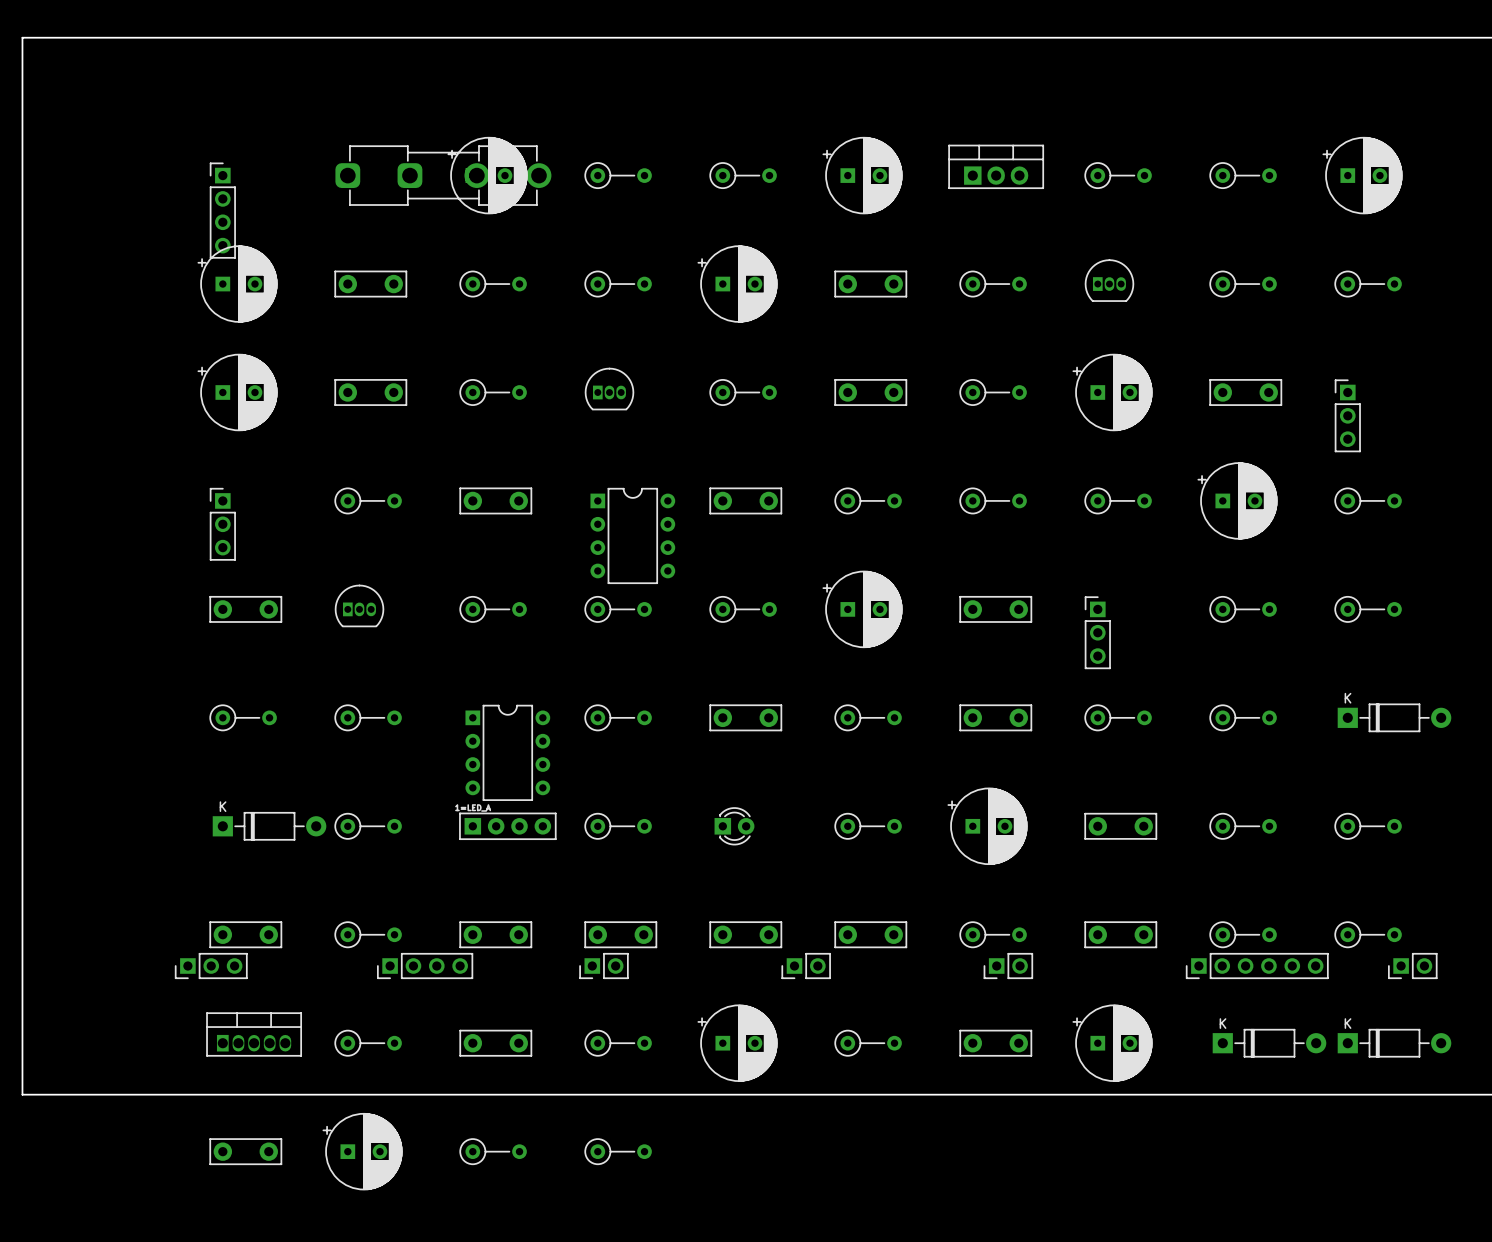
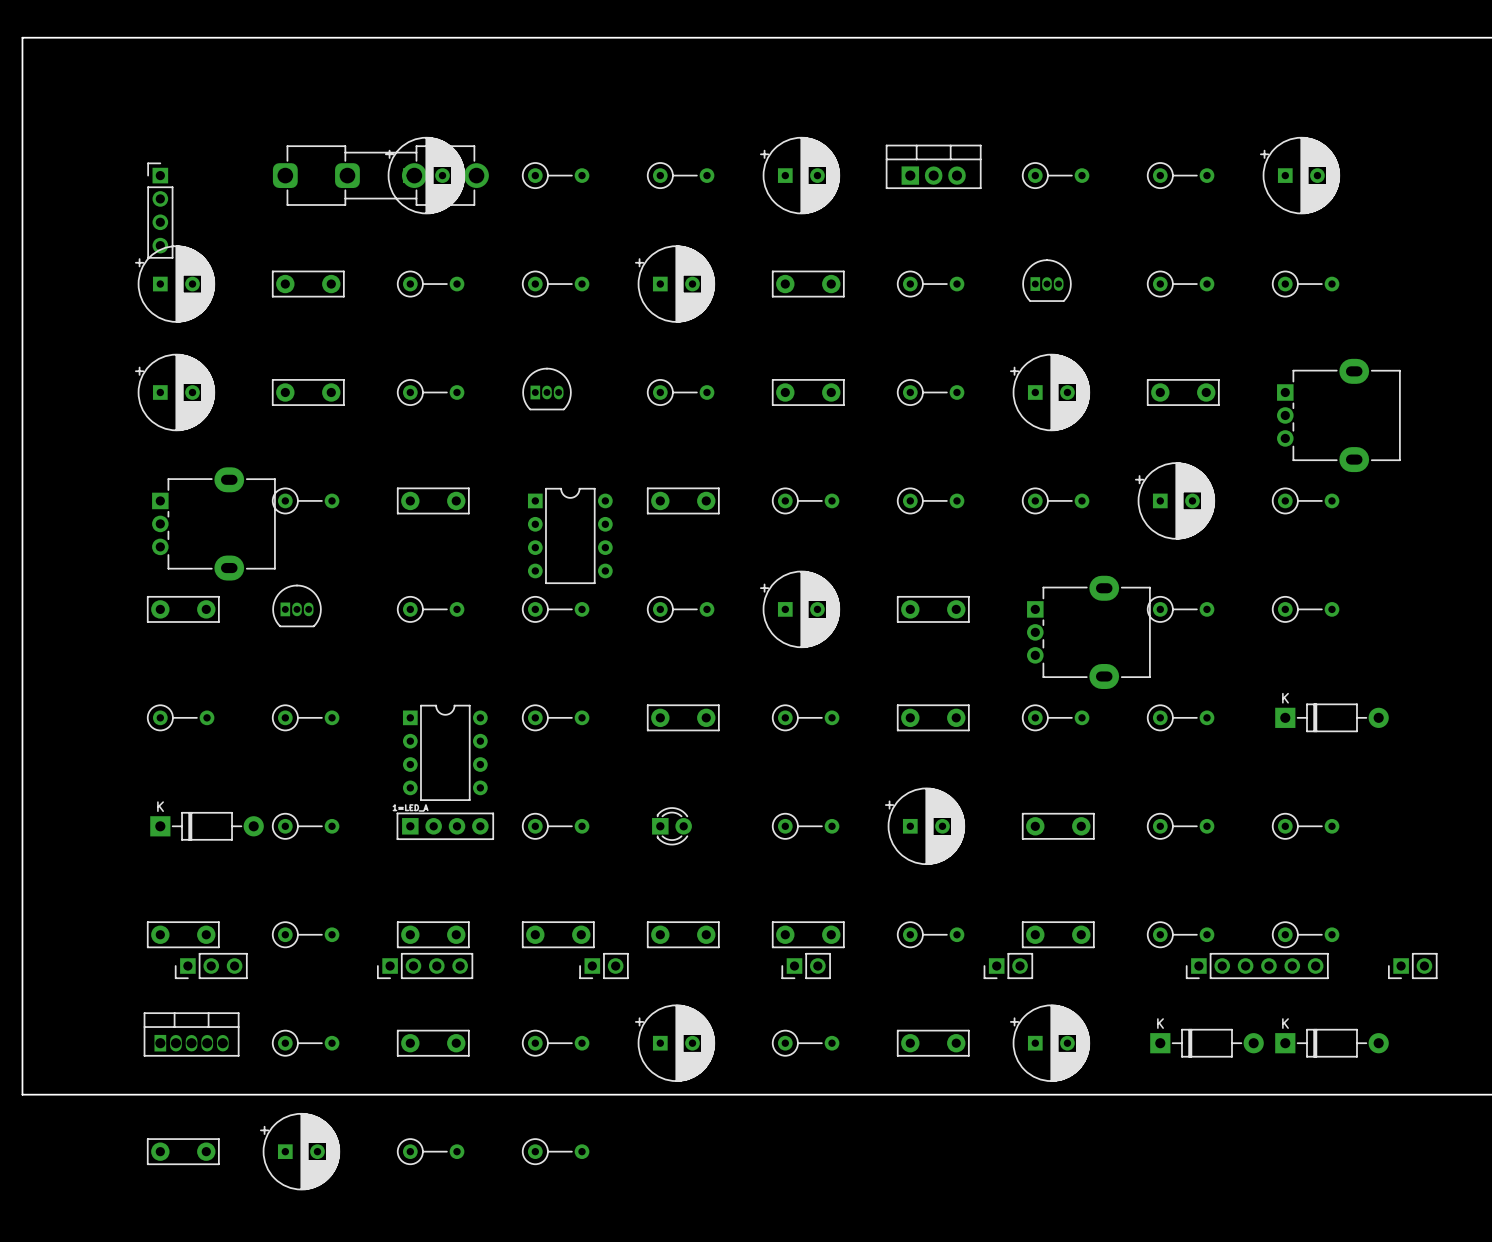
part position: (996, 166) -> (933, 166)
part position: (443, 175) -> (380, 175)
part position: (487, 175) -> (425, 175)
part: none -> (555, 175)
part: (618, 175) -> none
part: none -> (680, 175)
part: (743, 175) -> none
part: none -> (800, 175)
part: (862, 175) -> none
part: none -> (1055, 175)
part: (1118, 175) -> none
part: none -> (1180, 175)
part: (1243, 175) -> none
part position: (1362, 175) -> (1300, 175)
part position: (222, 210) -> (160, 210)
part position: (1109, 280) -> (1046, 280)
part: none -> (175, 284)
part: (237, 284) -> none
part: none -> (308, 284)
part: (370, 284) -> none
part: none -> (430, 284)
part: (493, 284) -> none
part: none -> (555, 284)
part: (618, 284) -> none
part: none -> (675, 284)
part: (737, 284) -> none
part: none -> (808, 284)
part: (870, 284) -> none
part: none -> (930, 284)
part: (993, 284) -> none
part: none -> (1180, 284)
part: (1243, 284) -> none
part: none -> (1305, 284)
part: (1368, 284) -> none
part footprint: [1335, 379, 1361, 452] -> [1277, 358, 1401, 473]
part position: (609, 389) -> (546, 389)
part: none -> (175, 392)
part: (237, 392) -> none
part: none -> (308, 392)
part: (370, 392) -> none
part: none -> (430, 392)
part: (493, 392) -> none
part: none -> (680, 392)
part: (743, 392) -> none
part: none -> (808, 392)
part: (870, 392) -> none
part: none -> (930, 392)
part: (993, 392) -> none
part: none -> (1050, 392)
part: (1112, 392) -> none
part position: (1245, 392) -> (1183, 392)
part footprint: [210, 488, 236, 561] -> [152, 467, 276, 581]
part: none -> (305, 500)
part: (368, 500) -> none
part: none -> (433, 500)
part: (495, 500) -> none
part: none -> (683, 500)
part: (745, 500) -> none
part: none -> (805, 500)
part: (868, 500) -> none
part: none -> (930, 500)
part: (993, 500) -> none
part: none -> (1055, 500)
part: (1118, 500) -> none
part: none -> (1175, 500)
part: (1237, 500) -> none
part: none -> (1305, 500)
part: (1368, 500) -> none
part position: (632, 535) -> (570, 535)
part footprint: [1085, 596, 1111, 669] -> [1027, 575, 1151, 689]
part position: (359, 605) -> (297, 605)
part position: (245, 609) -> (183, 609)
part: none -> (430, 609)
part: (493, 609) -> none
part: none -> (555, 609)
part: (618, 609) -> none
part: none -> (680, 609)
part: (743, 609) -> none
part position: (862, 609) -> (800, 609)
part: none -> (933, 609)
part: (995, 609) -> none
part: none -> (1180, 609)
part: (1243, 609) -> none
part: none -> (1305, 609)
part: (1368, 609) -> none
part: none -> (180, 717)
part: (243, 717) -> none
part: none -> (305, 717)
part: (368, 717) -> none
part: none -> (555, 717)
part: (618, 717) -> none
part position: (745, 717) -> (683, 717)
part: none -> (805, 717)
part: (868, 717) -> none
part: none -> (933, 717)
part: (995, 717) -> none
part: none -> (1055, 717)
part: (1118, 717) -> none
part: none -> (1180, 717)
part: (1243, 717) -> none
part position: (1394, 717) -> (1331, 717)
part position: (507, 752) -> (445, 752)
part position: (269, 826) -> (207, 826)
part: none -> (305, 826)
part: (368, 826) -> none
part position: (507, 826) -> (445, 826)
part: none -> (555, 826)
part: (618, 826) -> none
part position: (734, 826) -> (671, 826)
part: none -> (805, 826)
part: (868, 826) -> none
part position: (987, 826) -> (925, 826)
part: none -> (1058, 826)
part: (1120, 826) -> none
part: none -> (1180, 826)
part: (1243, 826) -> none
part: none -> (1305, 826)
part: (1368, 826) -> none
part position: (245, 934) -> (183, 934)
part: none -> (305, 934)
part: (368, 934) -> none
part: none -> (433, 934)
part: (495, 934) -> none
part: none -> (558, 934)
part: (620, 934) -> none
part: none -> (683, 934)
part: (745, 934) -> none
part: none -> (808, 934)
part: (870, 934) -> none
part: none -> (930, 934)
part: (993, 934) -> none
part: none -> (1058, 934)
part: (1120, 934) -> none
part: none -> (1180, 934)
part: (1243, 934) -> none
part: none -> (1305, 934)
part: (1368, 934) -> none
part position: (254, 1034) -> (191, 1034)
part: none -> (305, 1043)
part: (368, 1043) -> none
part: none -> (433, 1043)
part: (495, 1043) -> none
part: none -> (555, 1043)
part: (618, 1043) -> none
part position: (737, 1043) -> (675, 1043)
part: none -> (805, 1043)
part: (868, 1043) -> none
part: none -> (933, 1043)
part: (995, 1043) -> none
part position: (1112, 1043) -> (1050, 1043)
part: none -> (1206, 1043)
part: (1269, 1043) -> none
part: none -> (1331, 1043)
part: (1394, 1043) -> none
part position: (245, 1151) -> (183, 1151)
part position: (362, 1151) -> (300, 1151)
part: none -> (430, 1151)
part: (493, 1151) -> none
part: none -> (555, 1151)
part: (618, 1151) -> none

